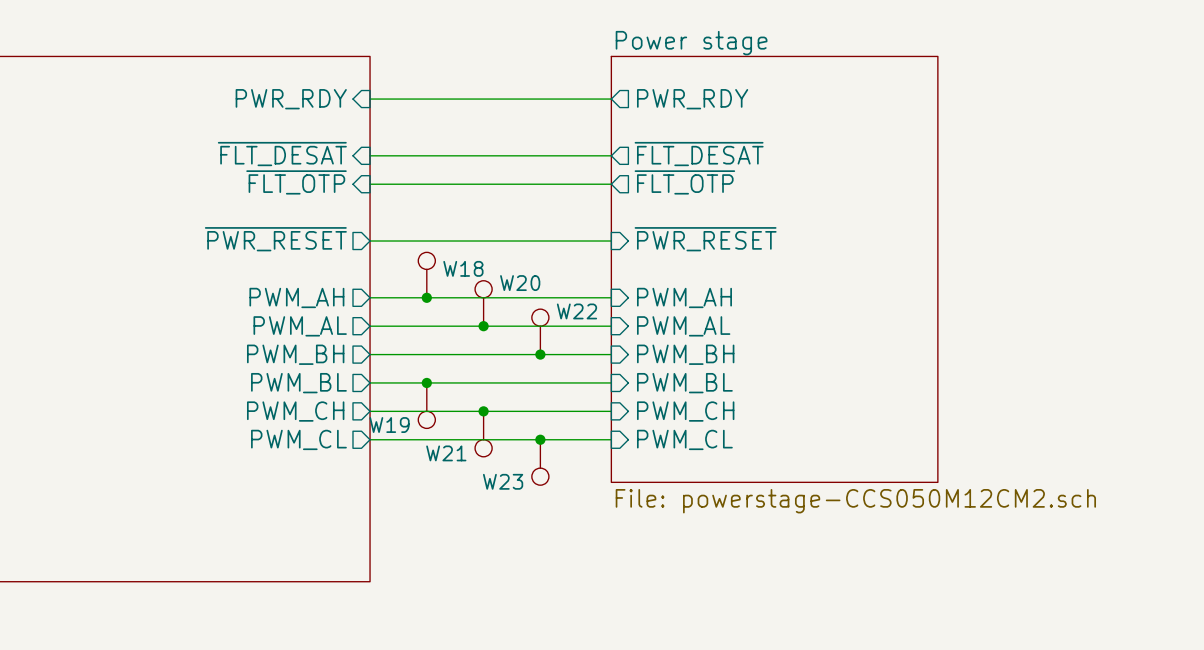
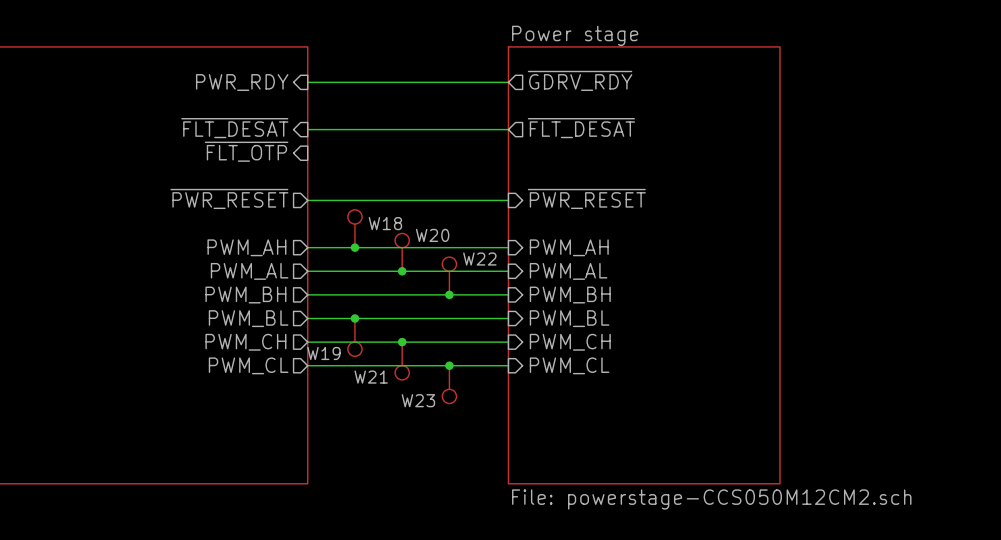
sheet pin: PWR_RDY (692, 99) -> ~{GDRV_RDY} (580, 80)
sheet pin: ~{FLT_OTP} (684, 182) -> none
wire: (370, 184) (611, 184) -> none
sheet Power stage: File: powerstage-CCS050M12CM2.sch (774, 269) -> none
sheet Power stage: none -> File: powerstage-CCS050M12CM2.sch (644, 265)

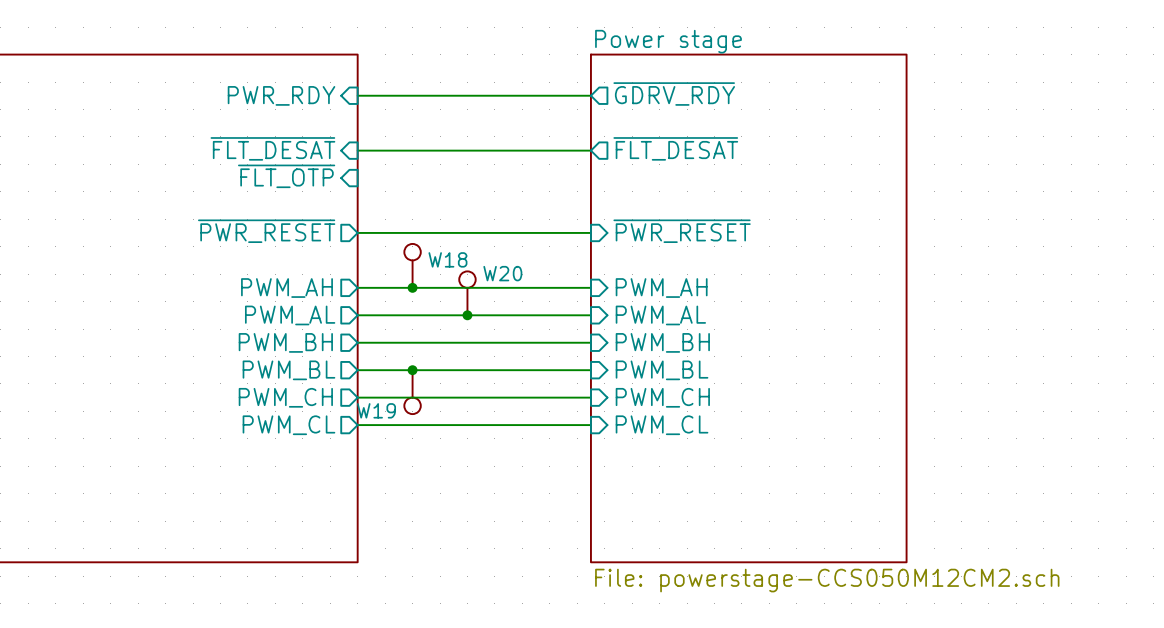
W22: (449, 275) -> none
junction: (449, 294) -> none
junction: (402, 342) -> none
W21: (402, 360) -> none
junction: (449, 365) -> none
W23: (449, 384) -> none

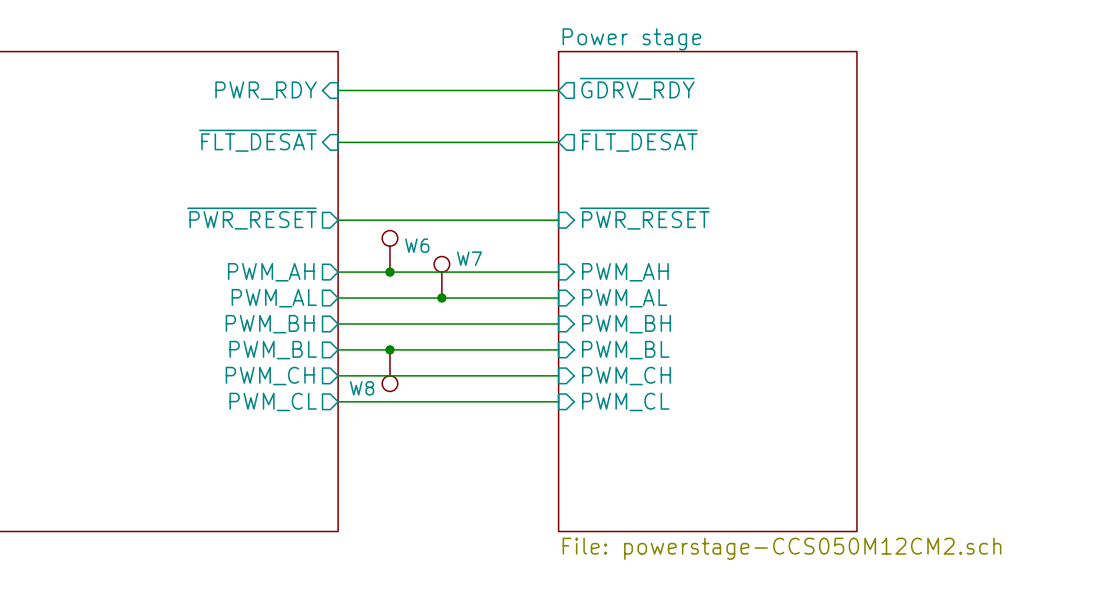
sheet pin: ~{FLT_OTP} (286, 176) -> none
W18 name: W18 (447, 259) -> W6 (417, 245)
W20 name: W20 (502, 273) -> W7 (469, 258)
W19 name: W19 (376, 410) -> W8 (362, 388)

